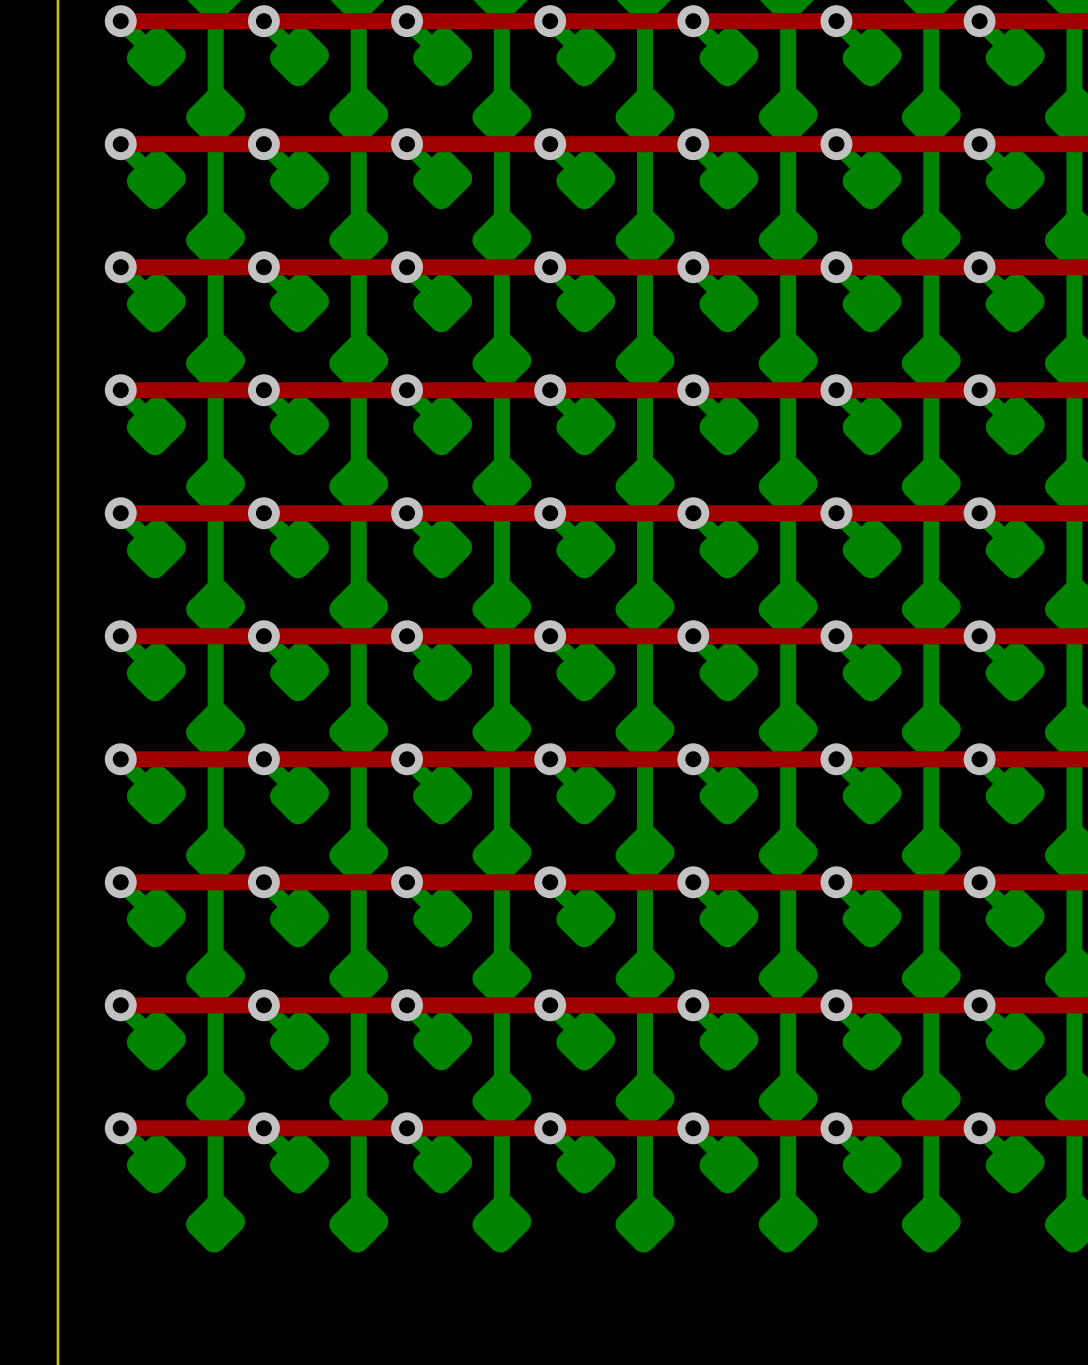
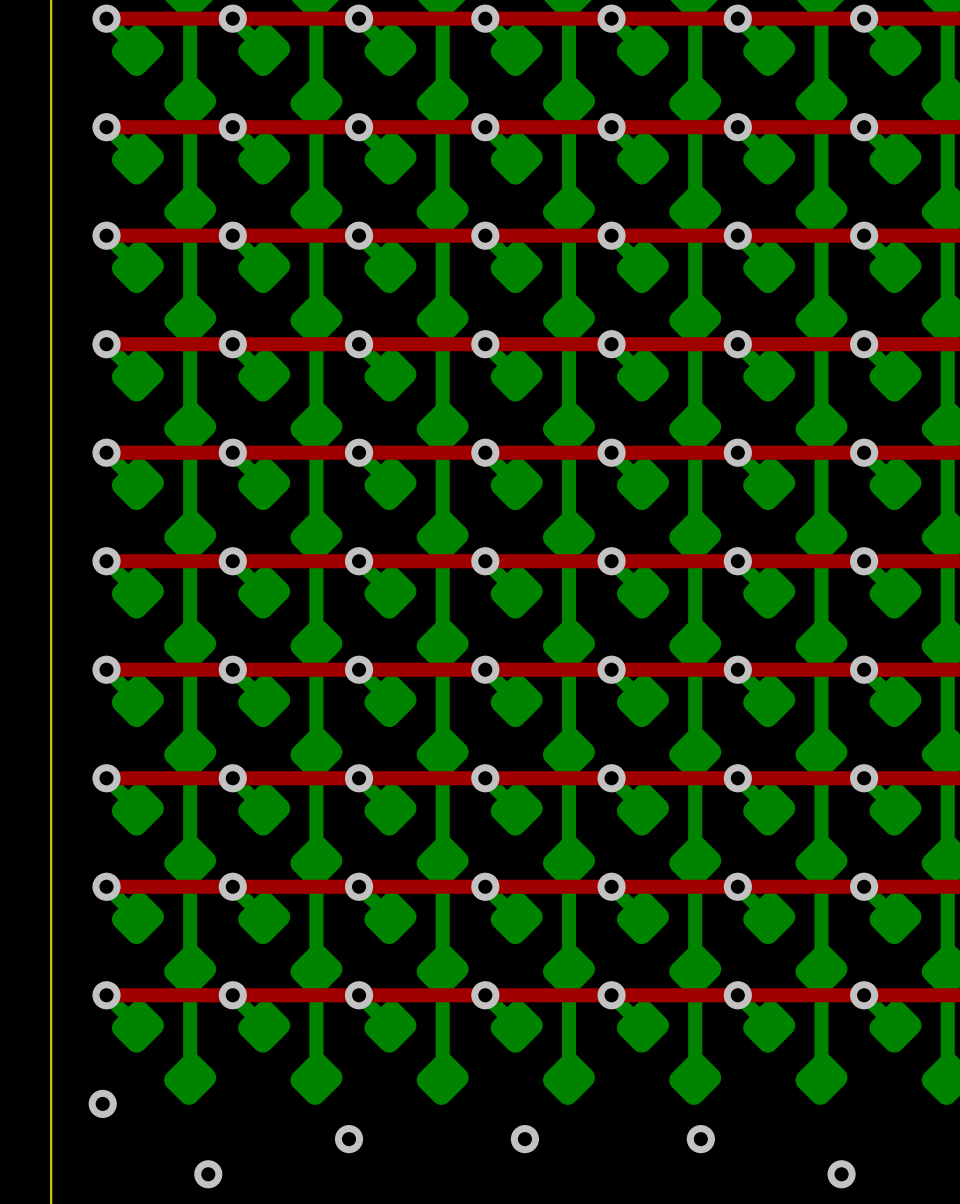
via: none -> (102, 1103)
via: none -> (349, 1139)
via: none -> (524, 1139)
via: none -> (700, 1139)
via: none -> (208, 1174)
via: none -> (841, 1174)

